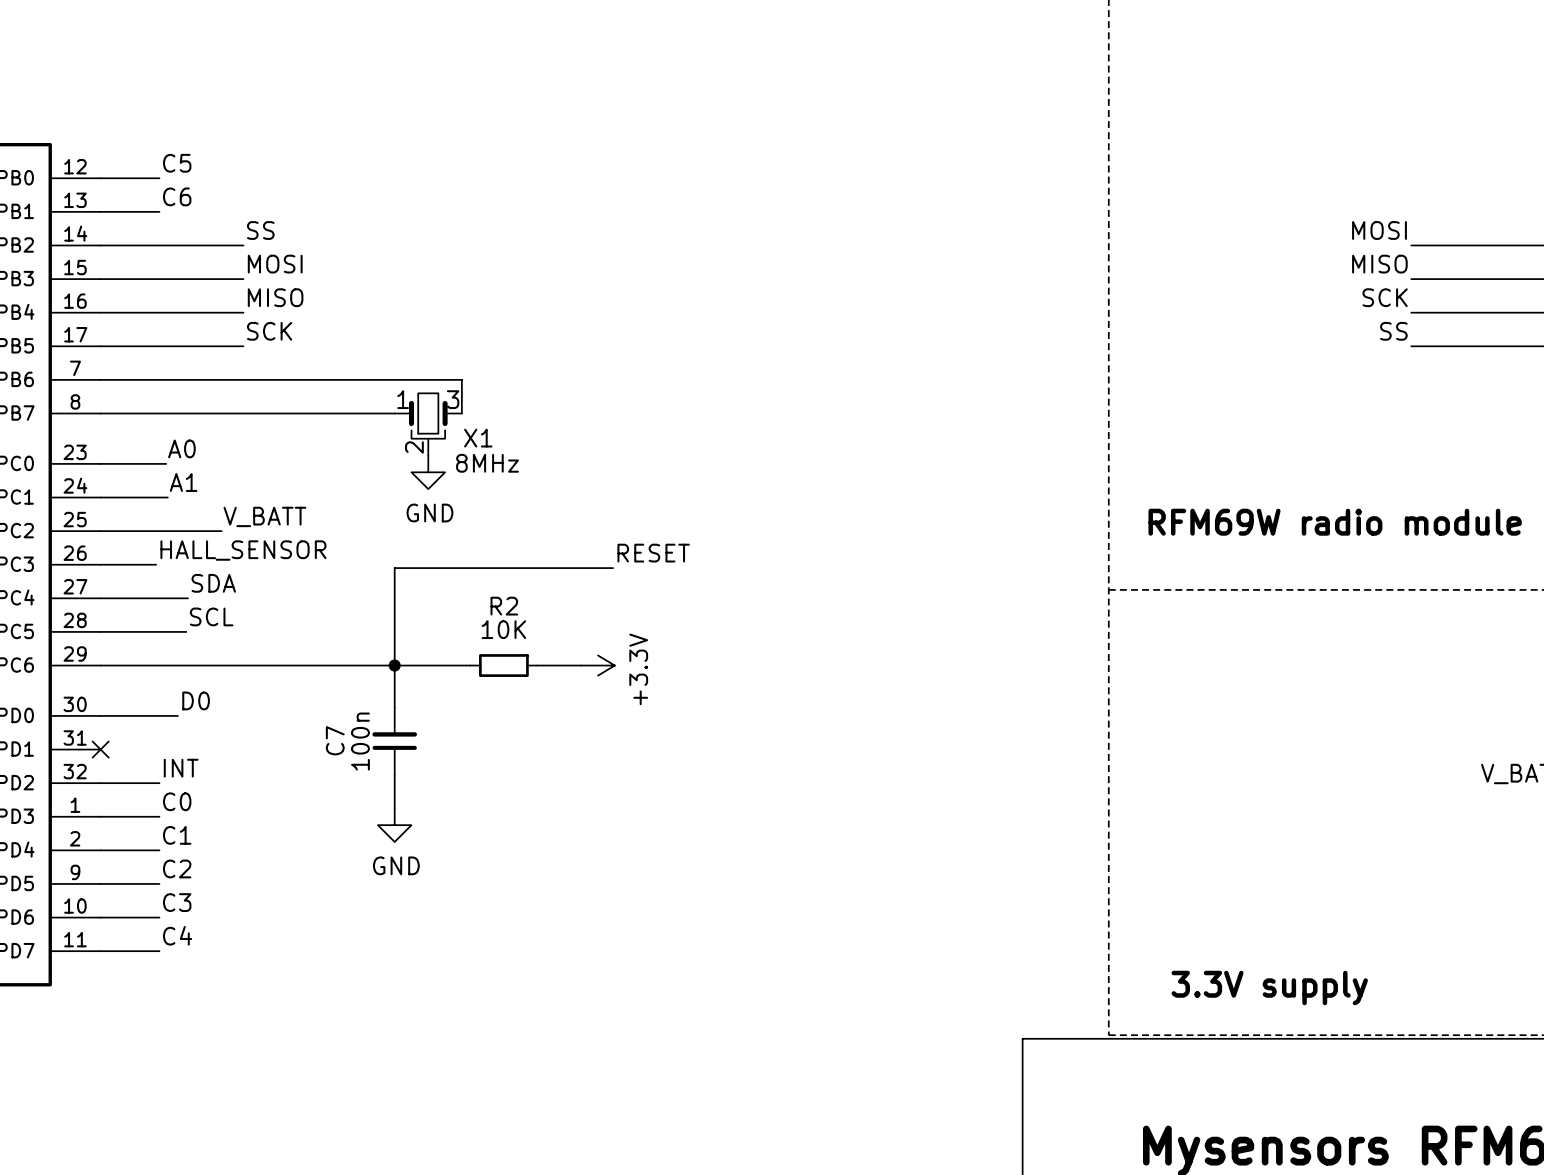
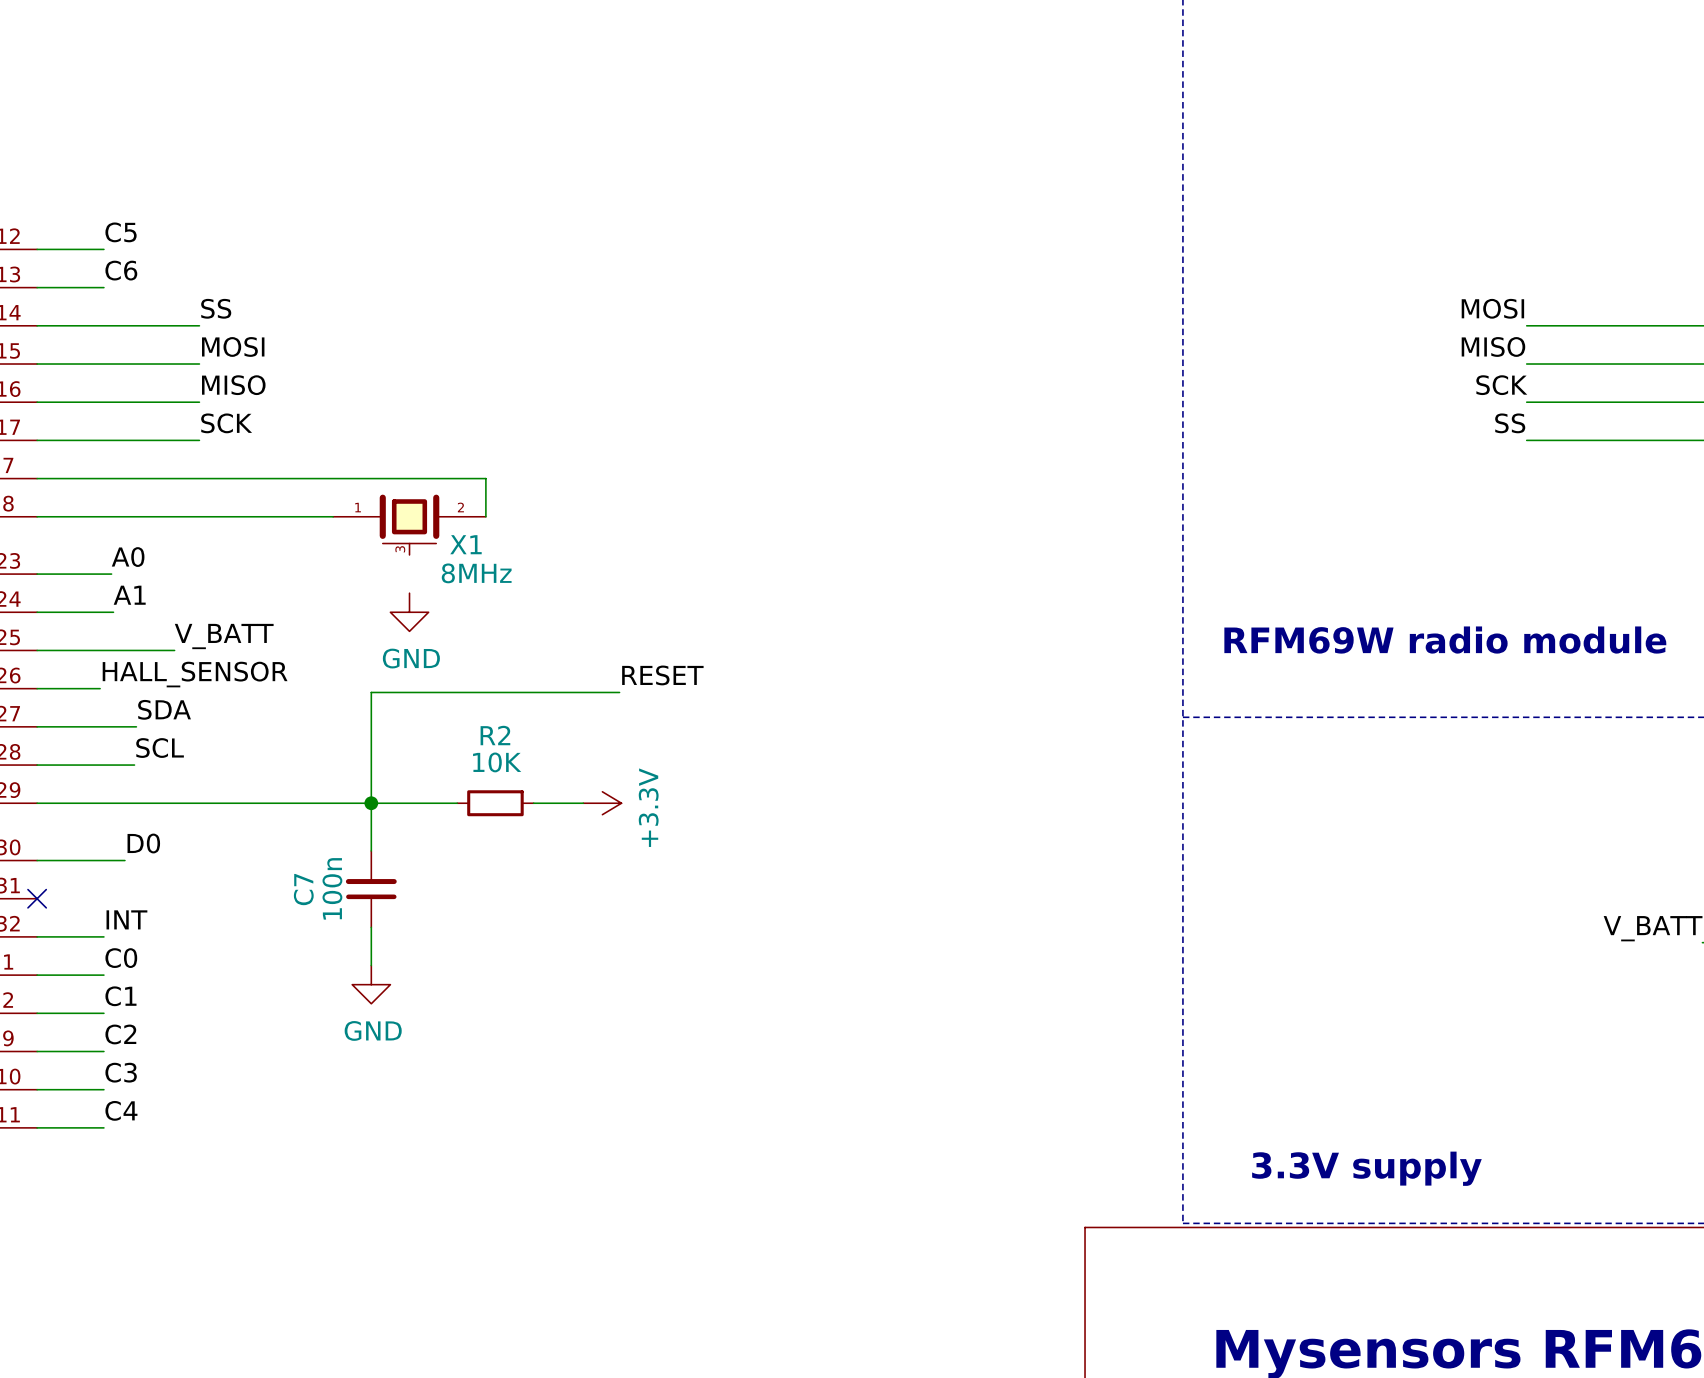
wire: (461, 379) (461, 413) -> (447, 478) (485, 478) (485, 516)
X1 symbol: [394, 393, 462, 456] -> [333, 494, 486, 555]
power symbol position: GND (428, 472) -> GND (409, 612)

